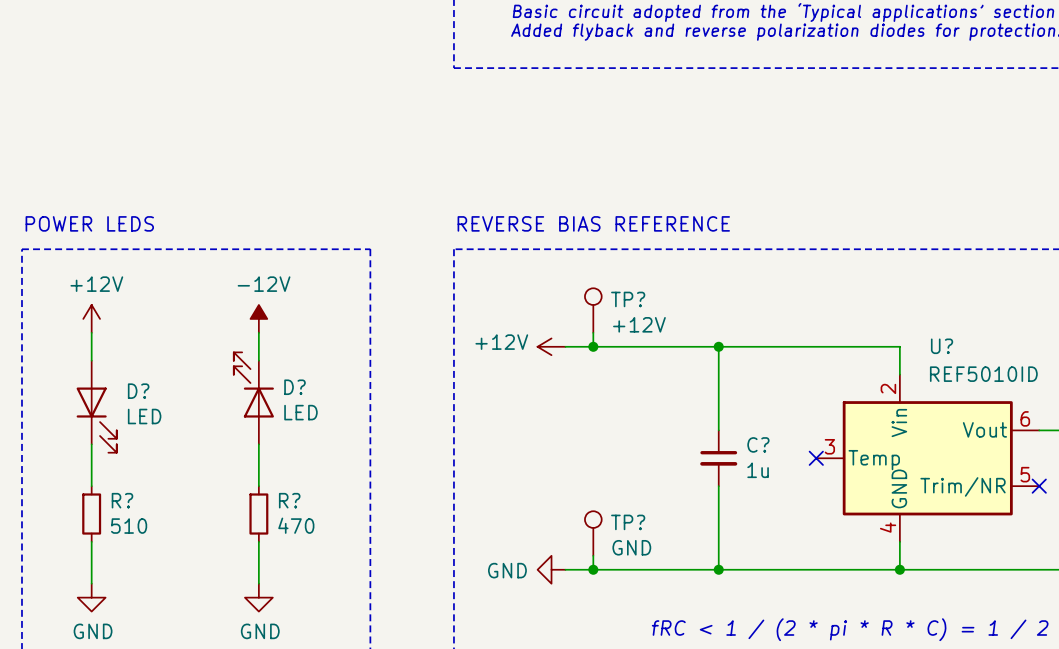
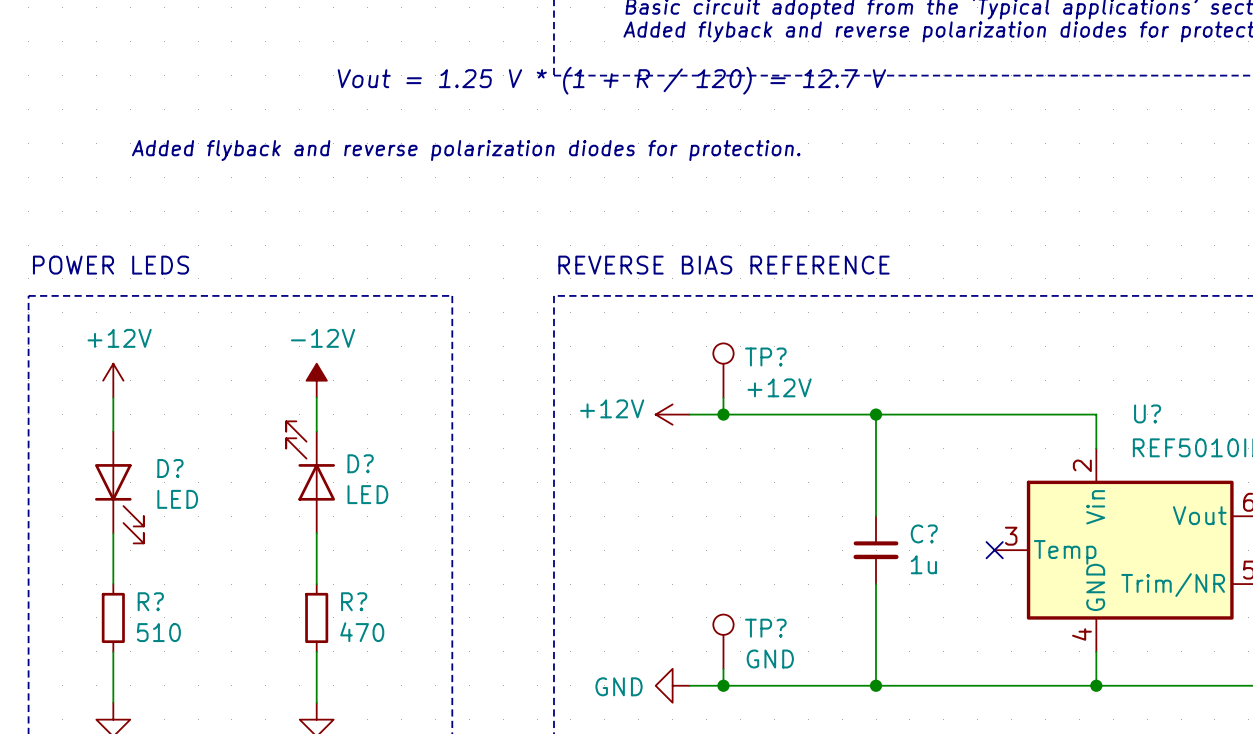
text: none -> Vout = 1.25 V * (1 + R / 120) = 12.7 V (611, 80)
text: none -> Added flyback and reverse polarization diodes for protection. (466, 150)

